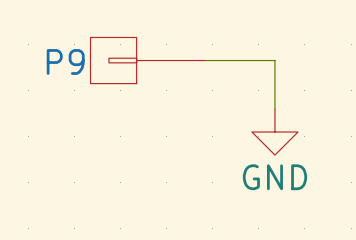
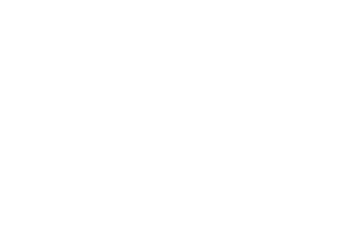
P9: (148, 60) -> none
wire: (205, 60) (274, 60) (274, 108) -> none
power symbol: GND (274, 132) -> none

